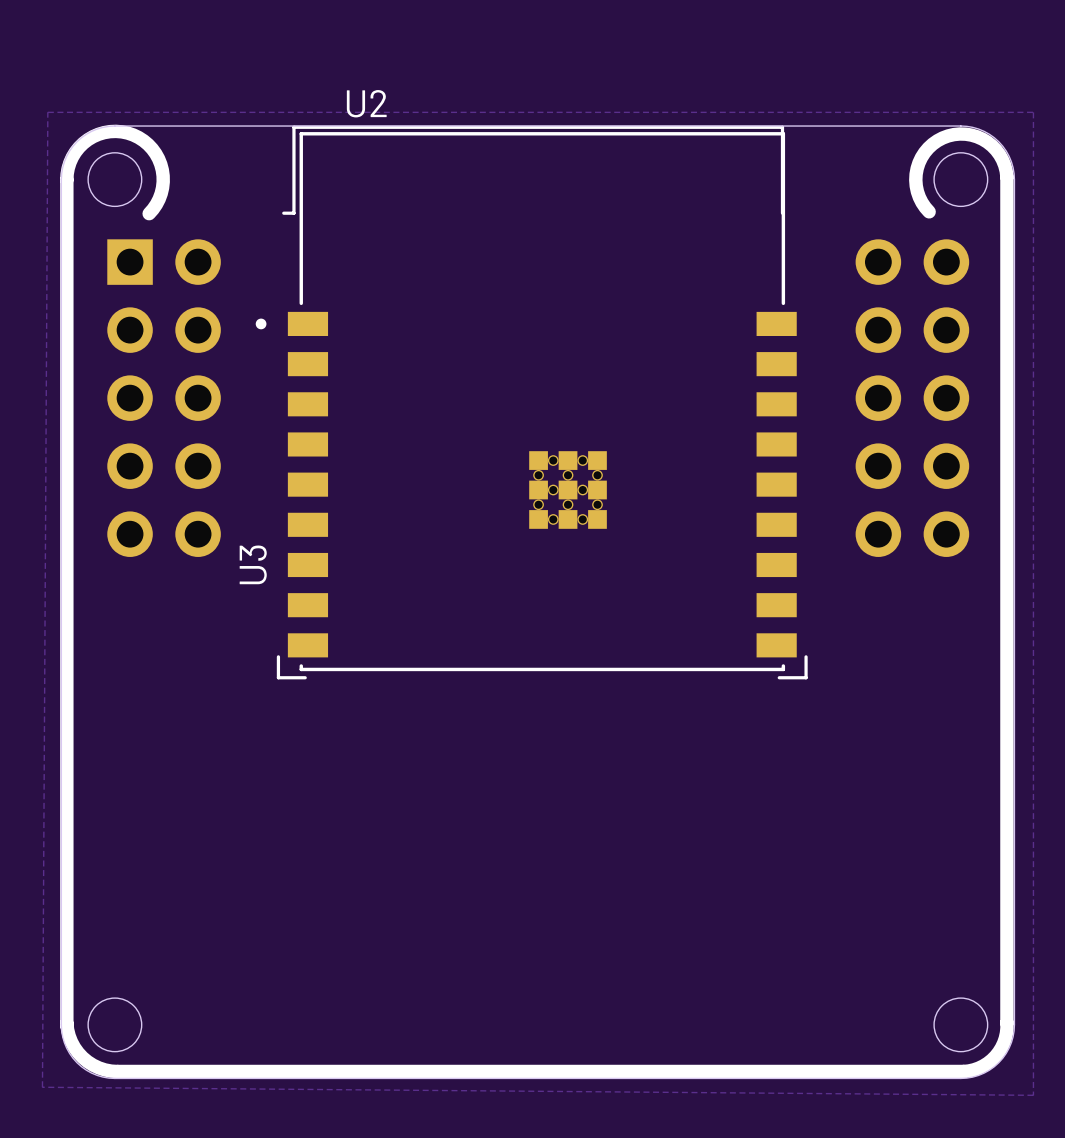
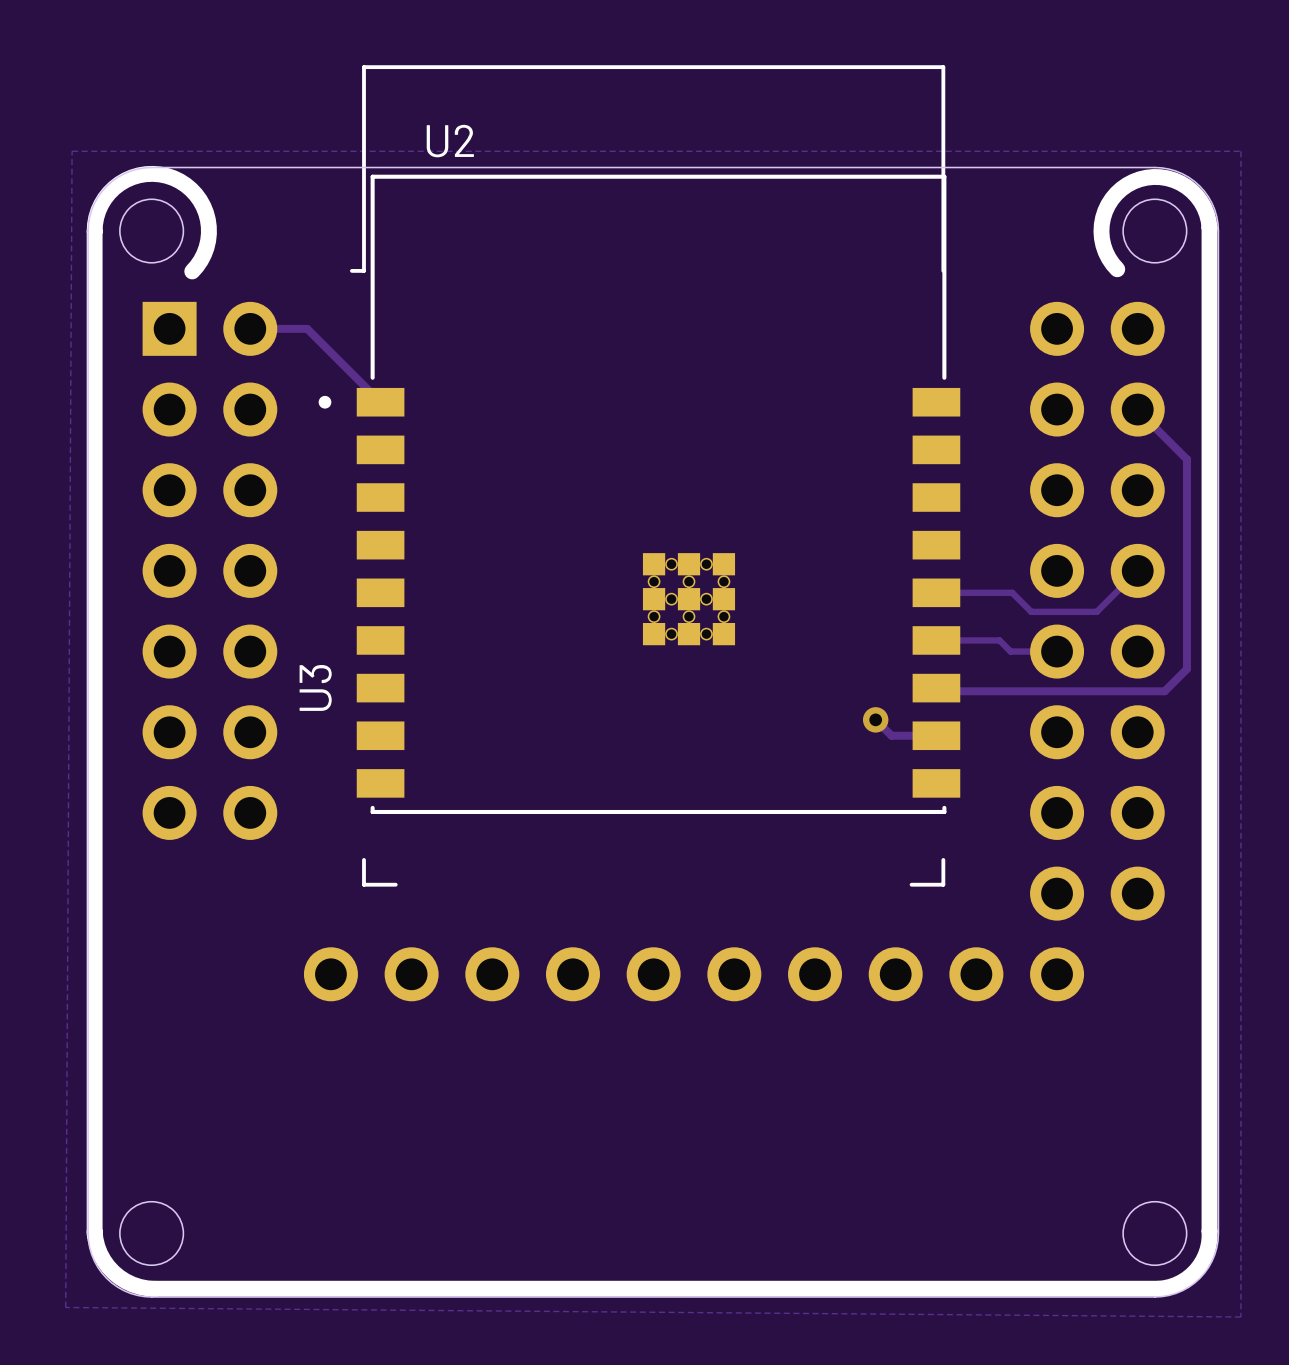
U3 footprint: [60, 124, 1016, 1080] -> [86, 65, 1220, 1298]
track: none -> (250, 328) (307, 328) (380, 402)
track: none -> (1137, 410) (1186, 459) (1186, 669) (1164, 691) (939, 691) (936, 688)
track: none -> (1137, 570) (1096, 611) (1031, 611) (1012, 592) (936, 592)
track: none -> (936, 640) (999, 640) (1010, 651) (1057, 651)
track: none -> (875, 719) (891, 735) (936, 735)
via: none -> (875, 719)

